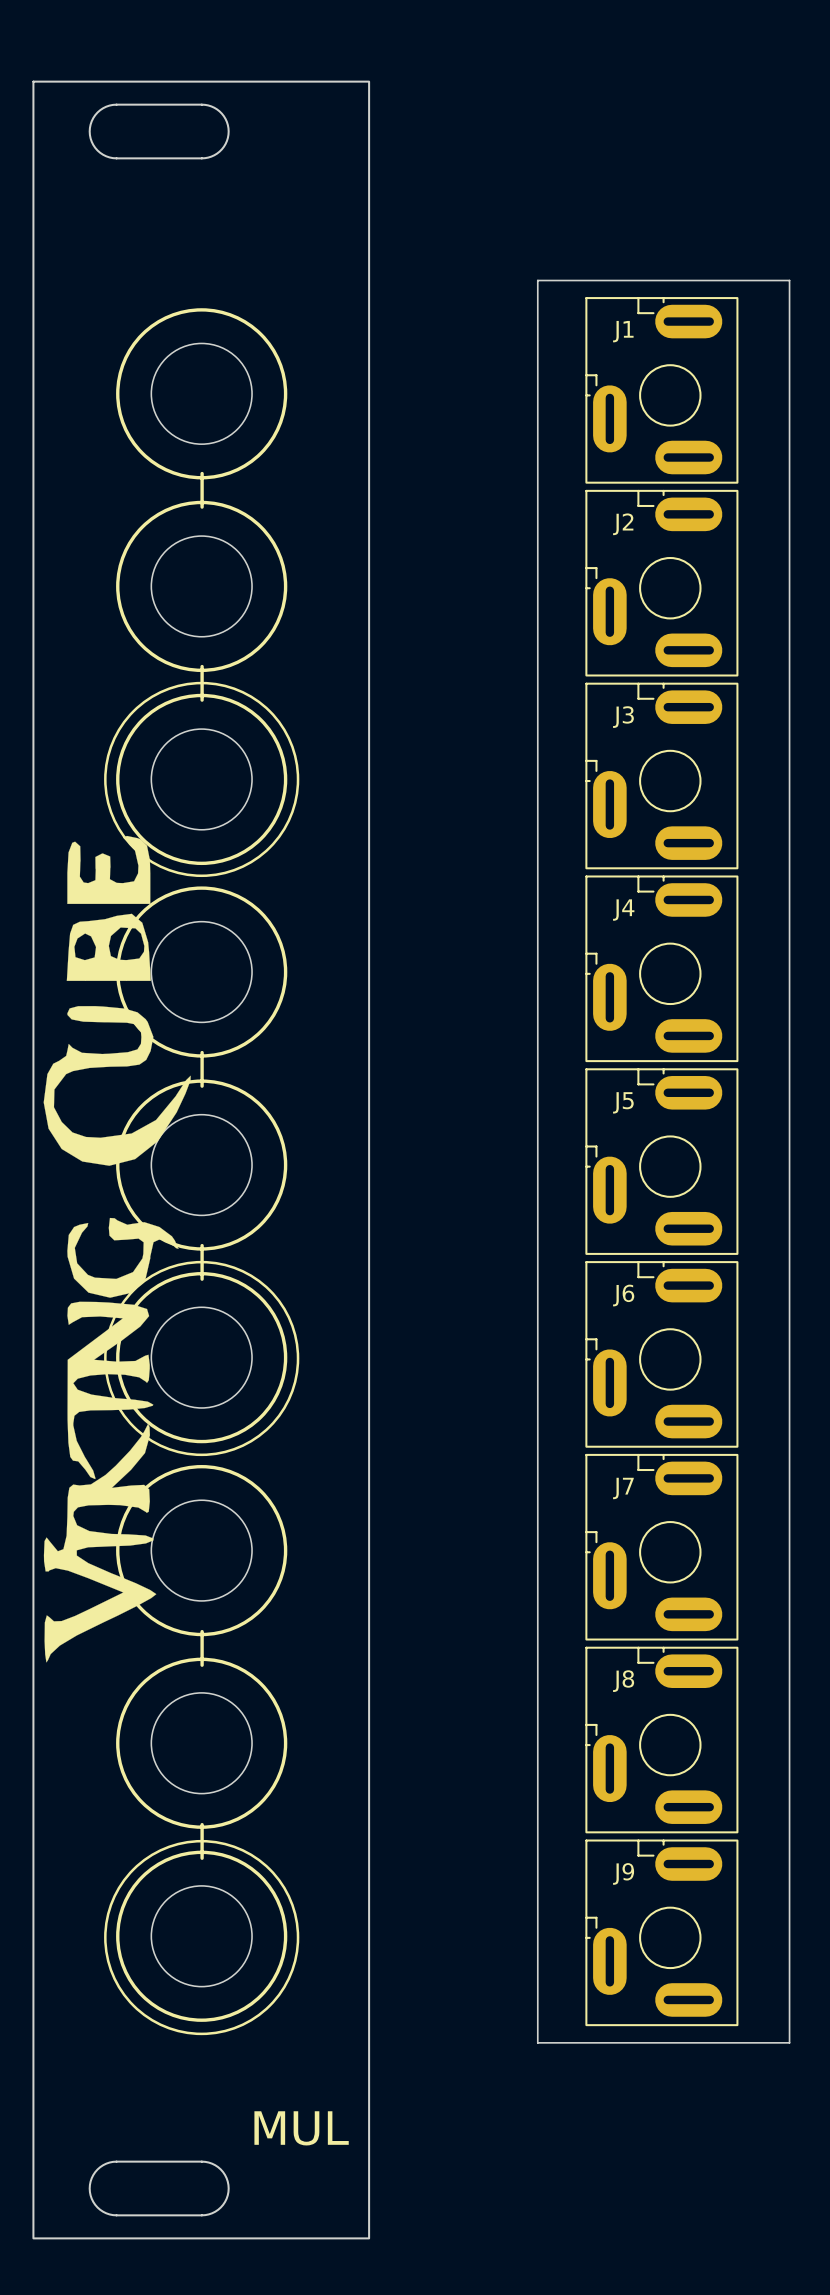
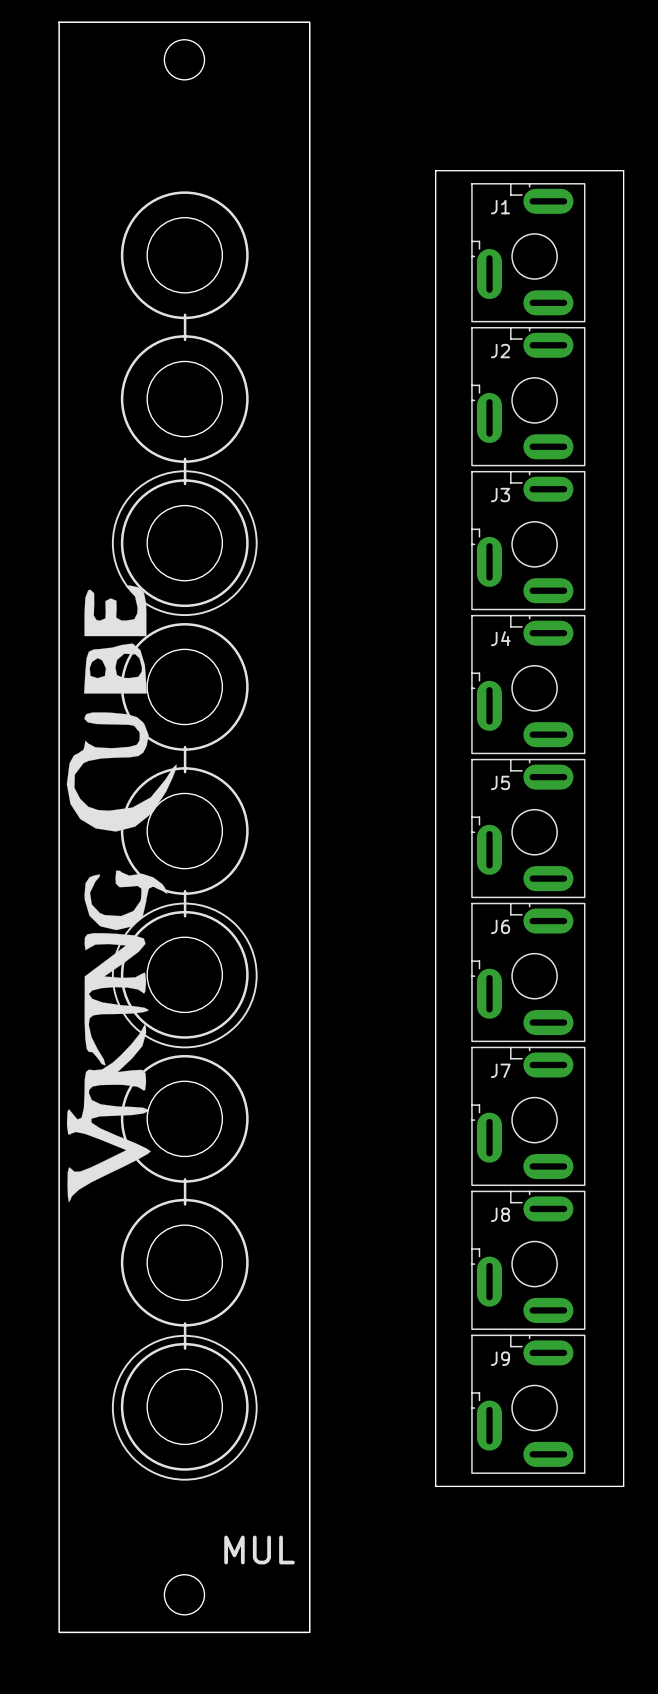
drawing: [32, 80, 371, 2240] -> none
part: none -> (184, 827)

